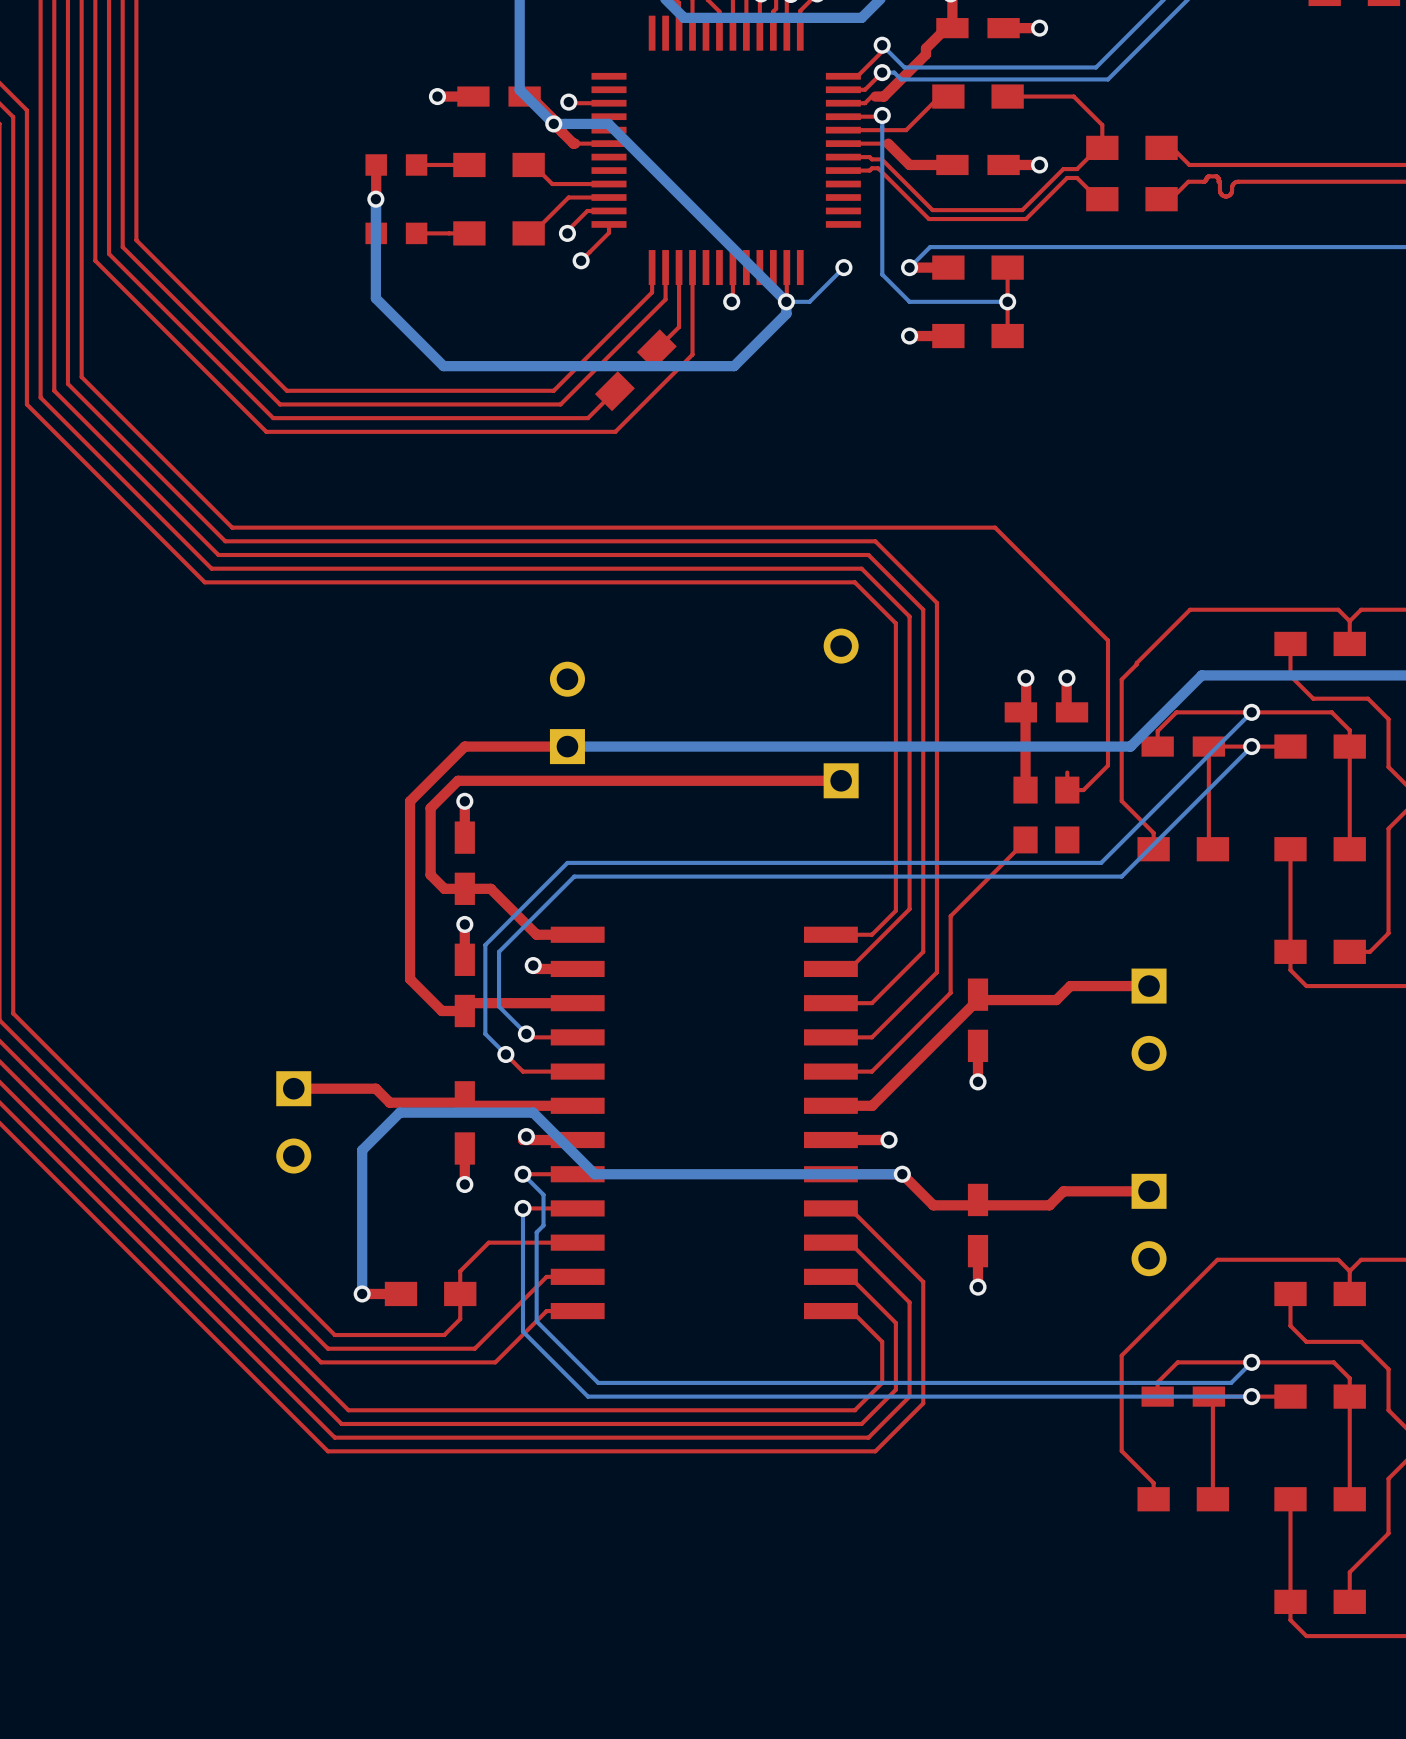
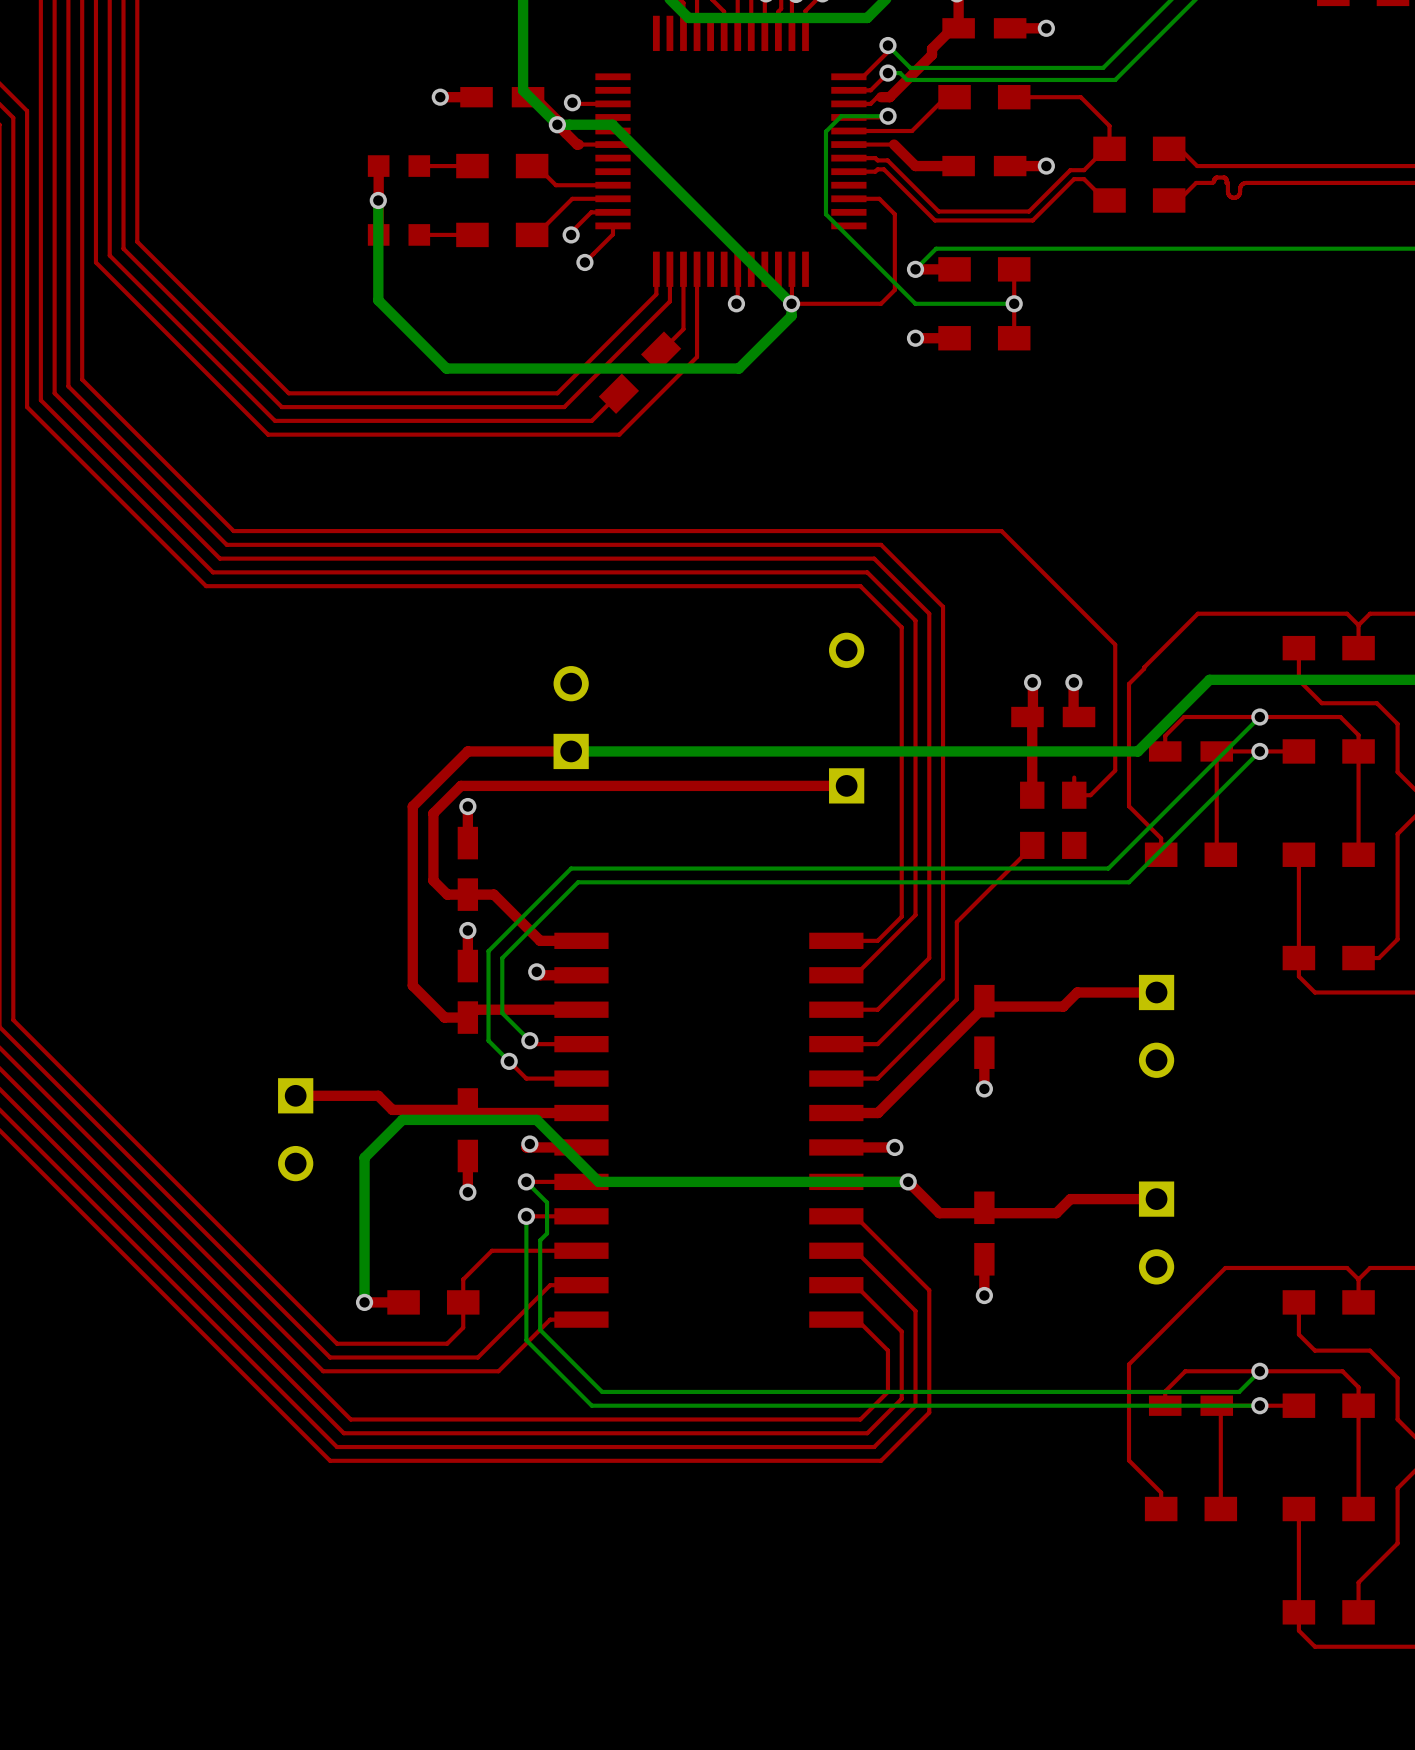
bottom track: (882, 115) (882, 274) -> (888, 116) (841, 116) (825, 131) (825, 214) (888, 276)
top track: none -> (848, 198) (879, 198) (894, 214) (894, 290) (881, 303) (791, 303)
bottom track: (843, 267) (809, 301) (786, 301) -> none
via: (843, 267) -> none

